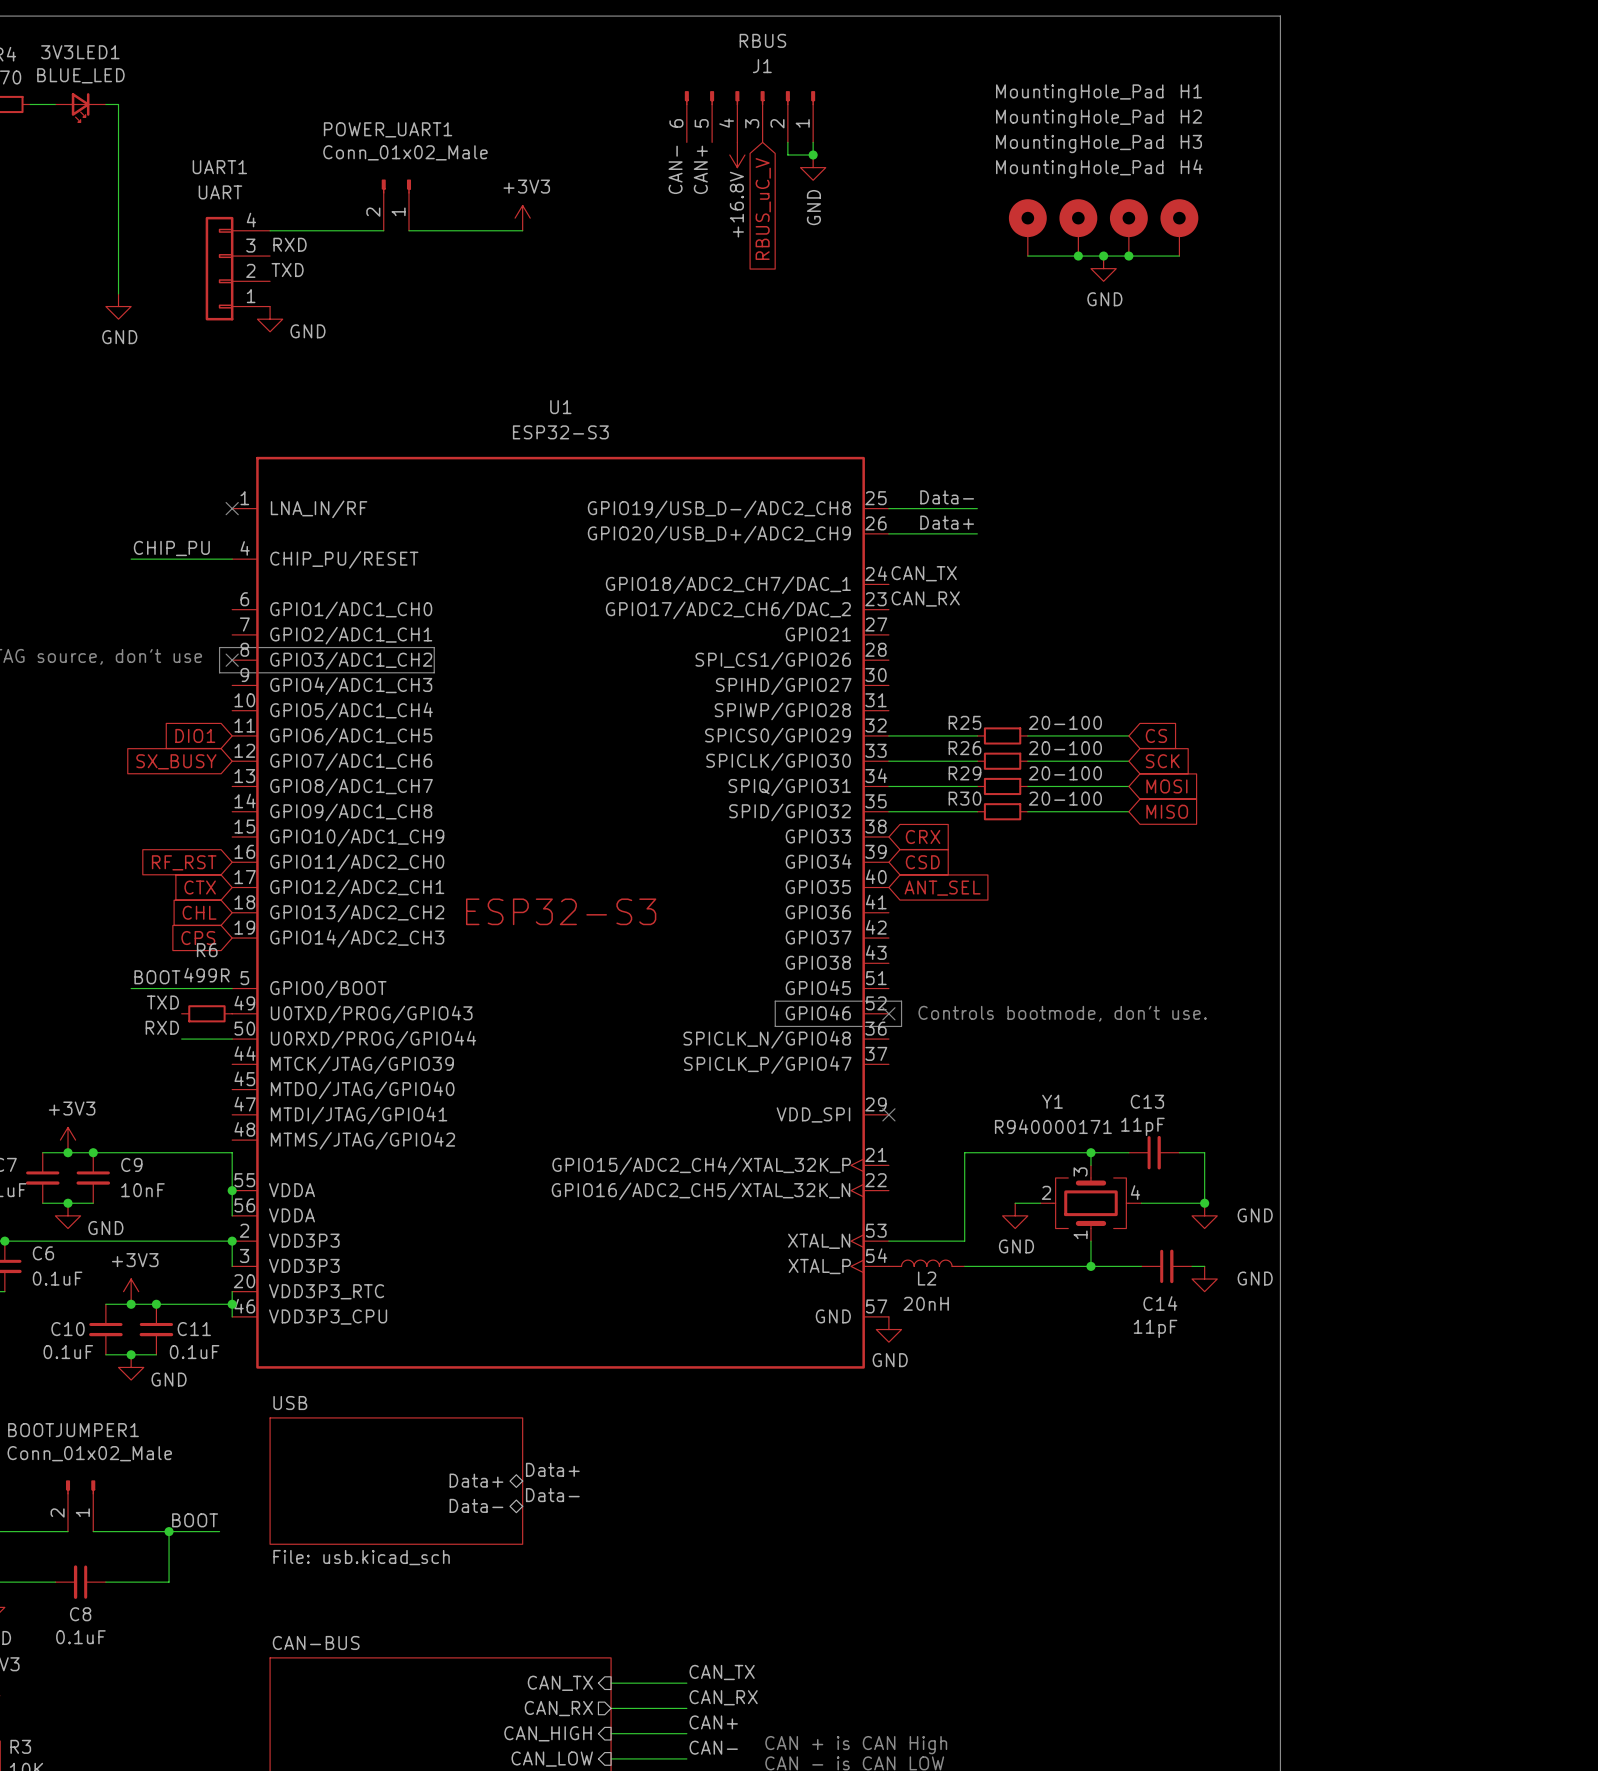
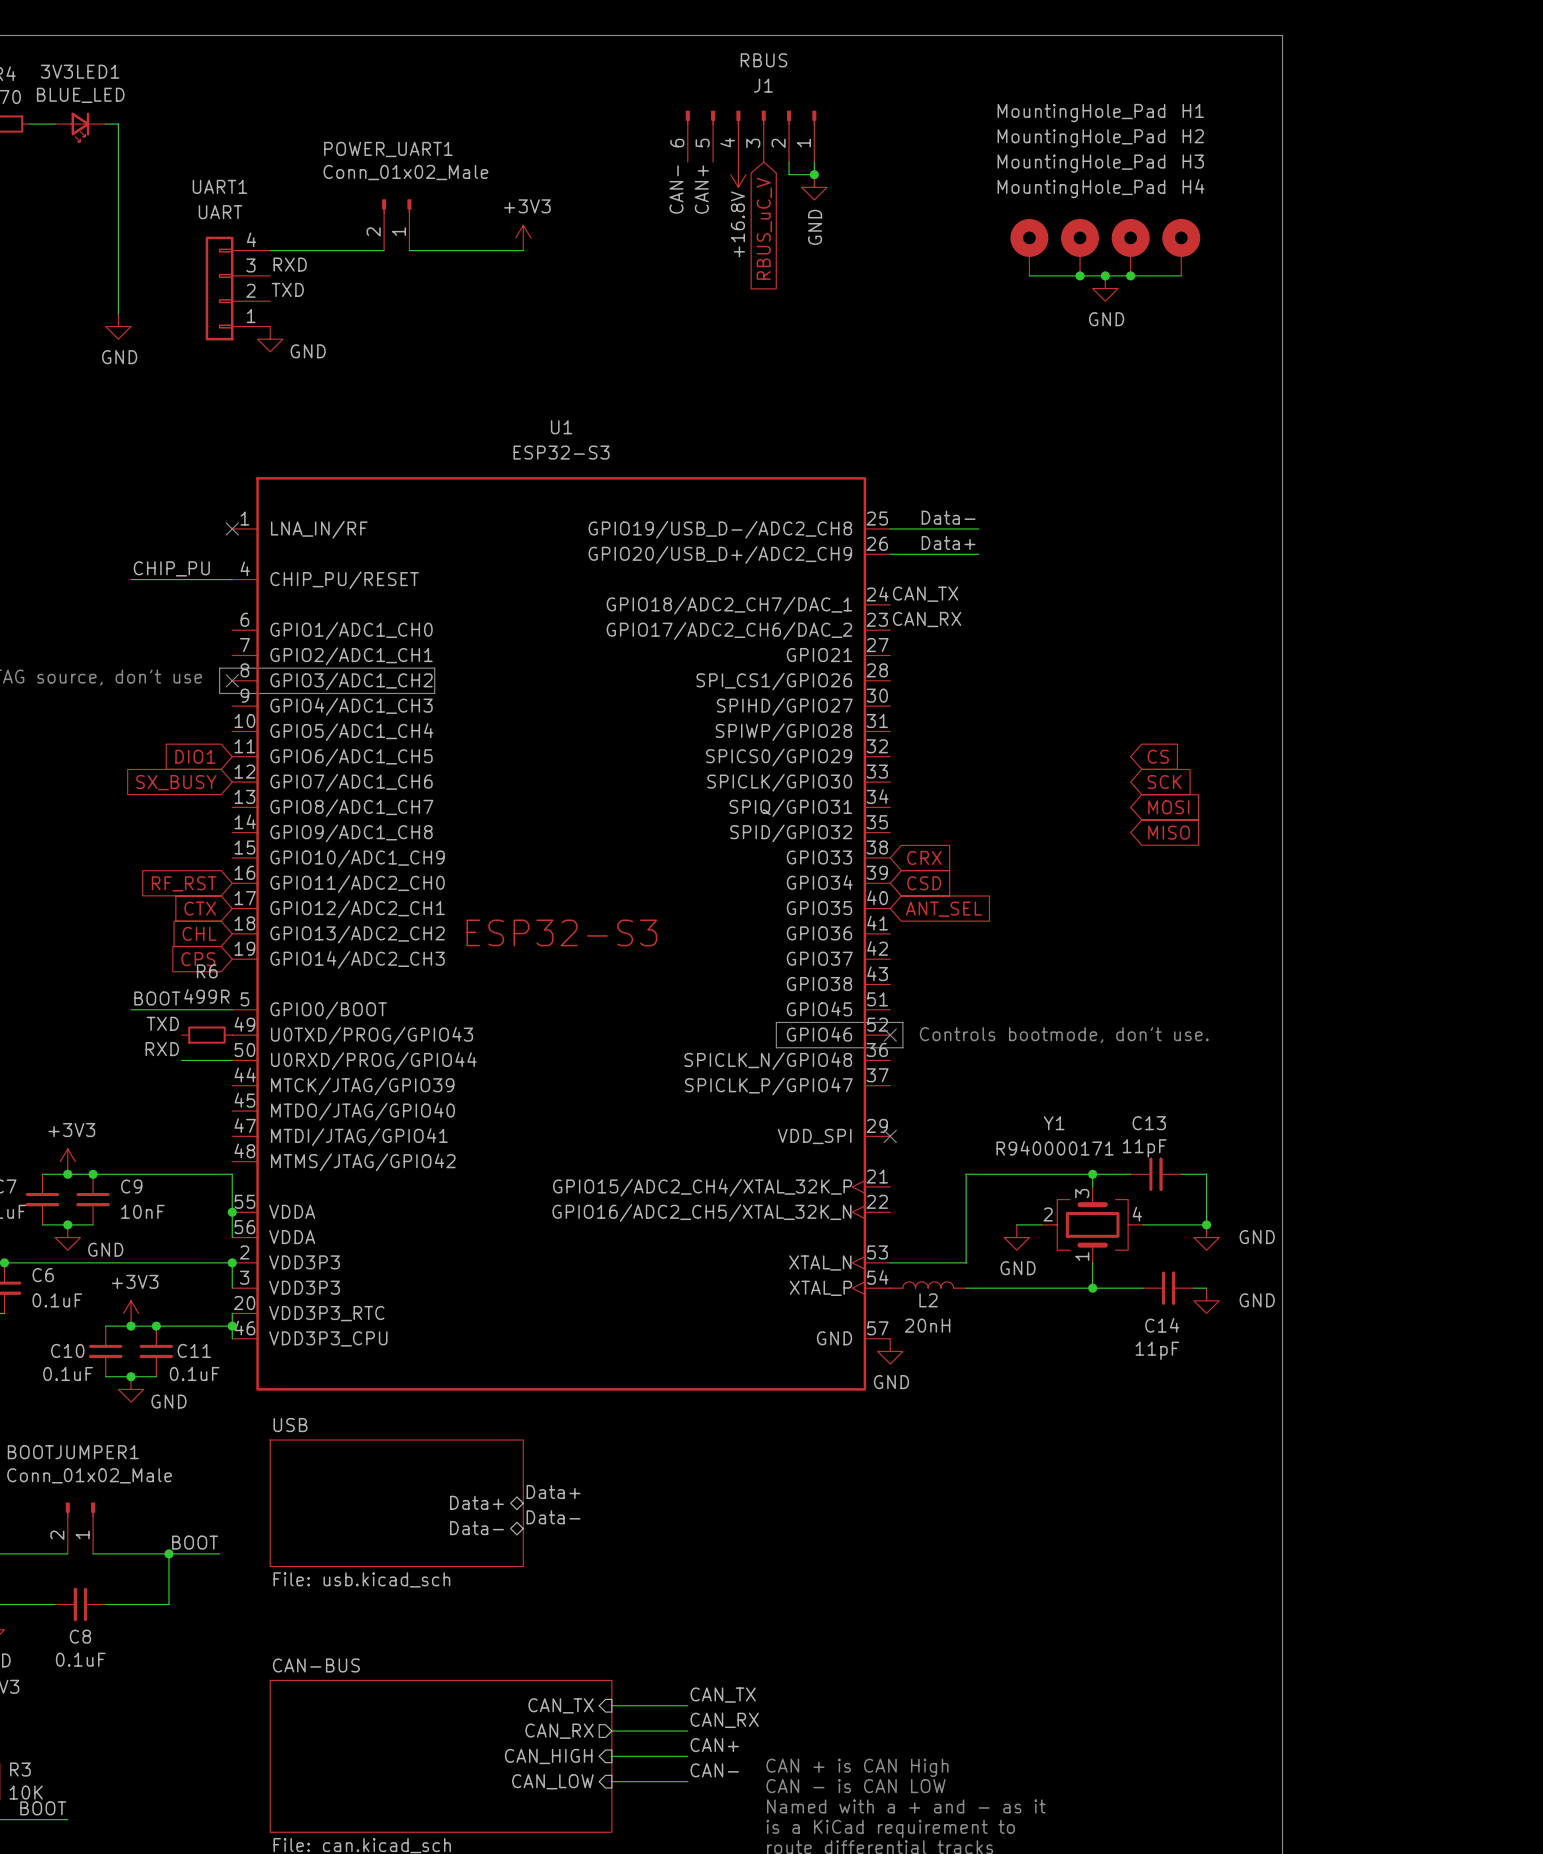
wire: (888, 735) (977, 735) -> none
R25: 20-100 (1002, 735) -> none
wire: (1027, 735) (1128, 735) -> none
wire: (888, 761) (977, 761) -> none
R26: 20-100 (1002, 761) -> none
wire: (1027, 761) (1128, 761) -> none
wire: (888, 786) (977, 786) -> none
R29: 20-100 (1002, 786) -> none
wire: (1027, 786) (1128, 786) -> none
wire: (888, 811) (977, 811) -> none
R30: 20-100 (1002, 811) -> none
wire: (1027, 811) (1128, 811) -> none

